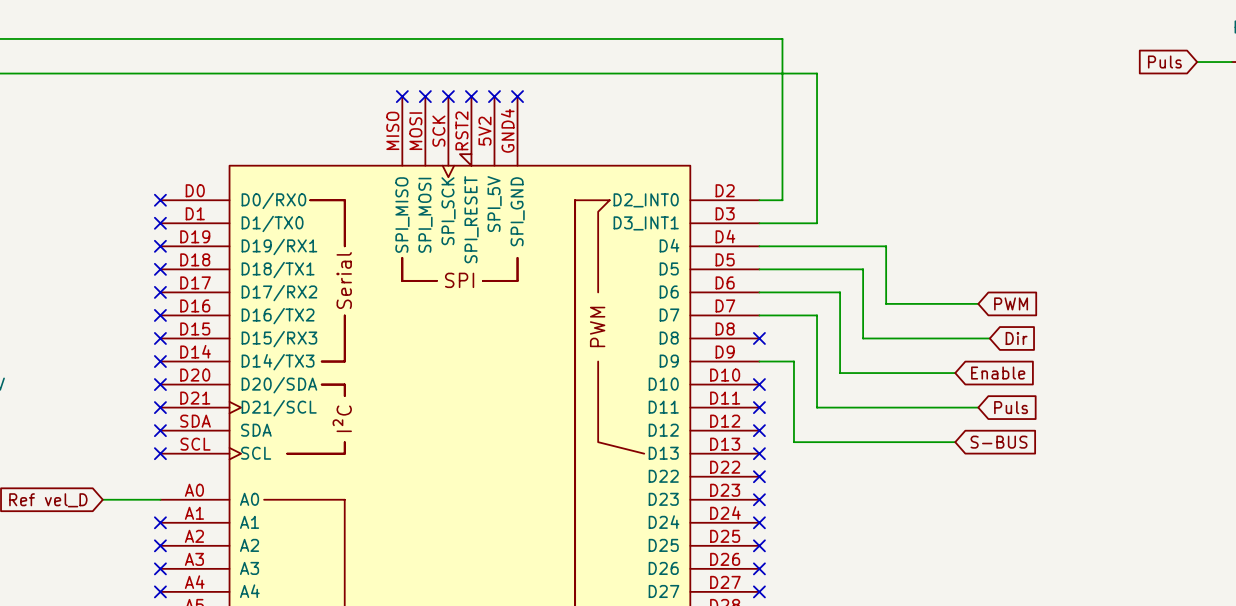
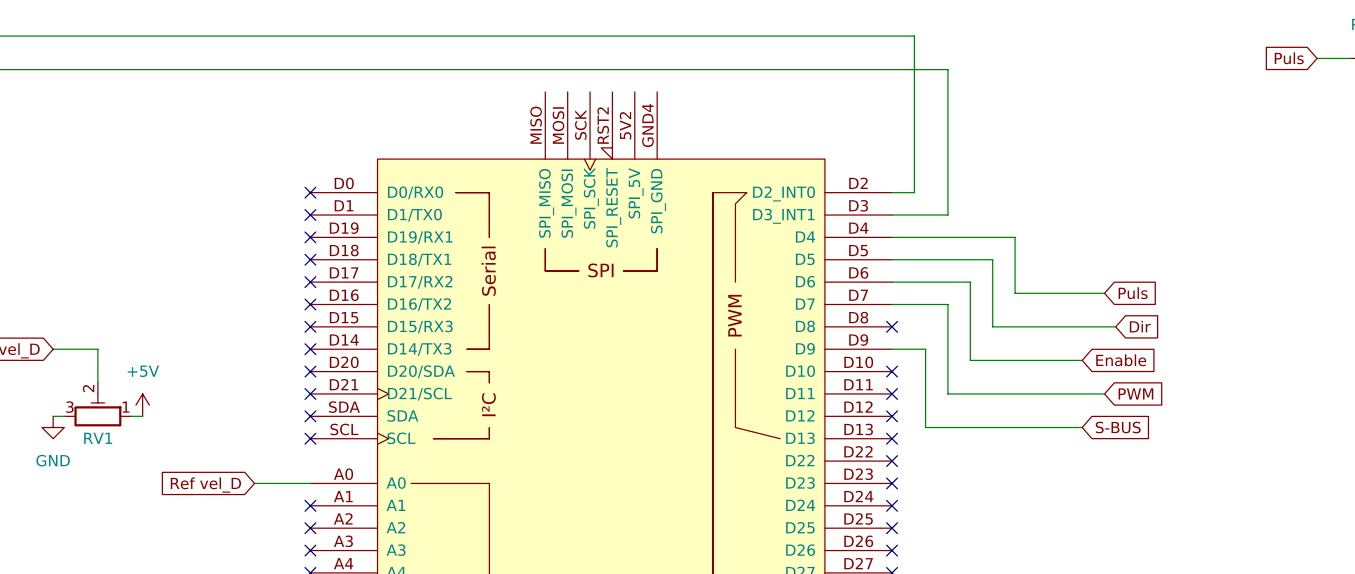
no-connect mark: (402, 96) -> none
no-connect mark: (425, 96) -> none
no-connect mark: (448, 96) -> none
no-connect mark: (471, 96) -> none
no-connect mark: (494, 96) -> none
no-connect mark: (517, 96) -> none
global label: PWM (1011, 303) -> Puls (1133, 293)
global label: Puls (1011, 407) -> PWM (1135, 393)

